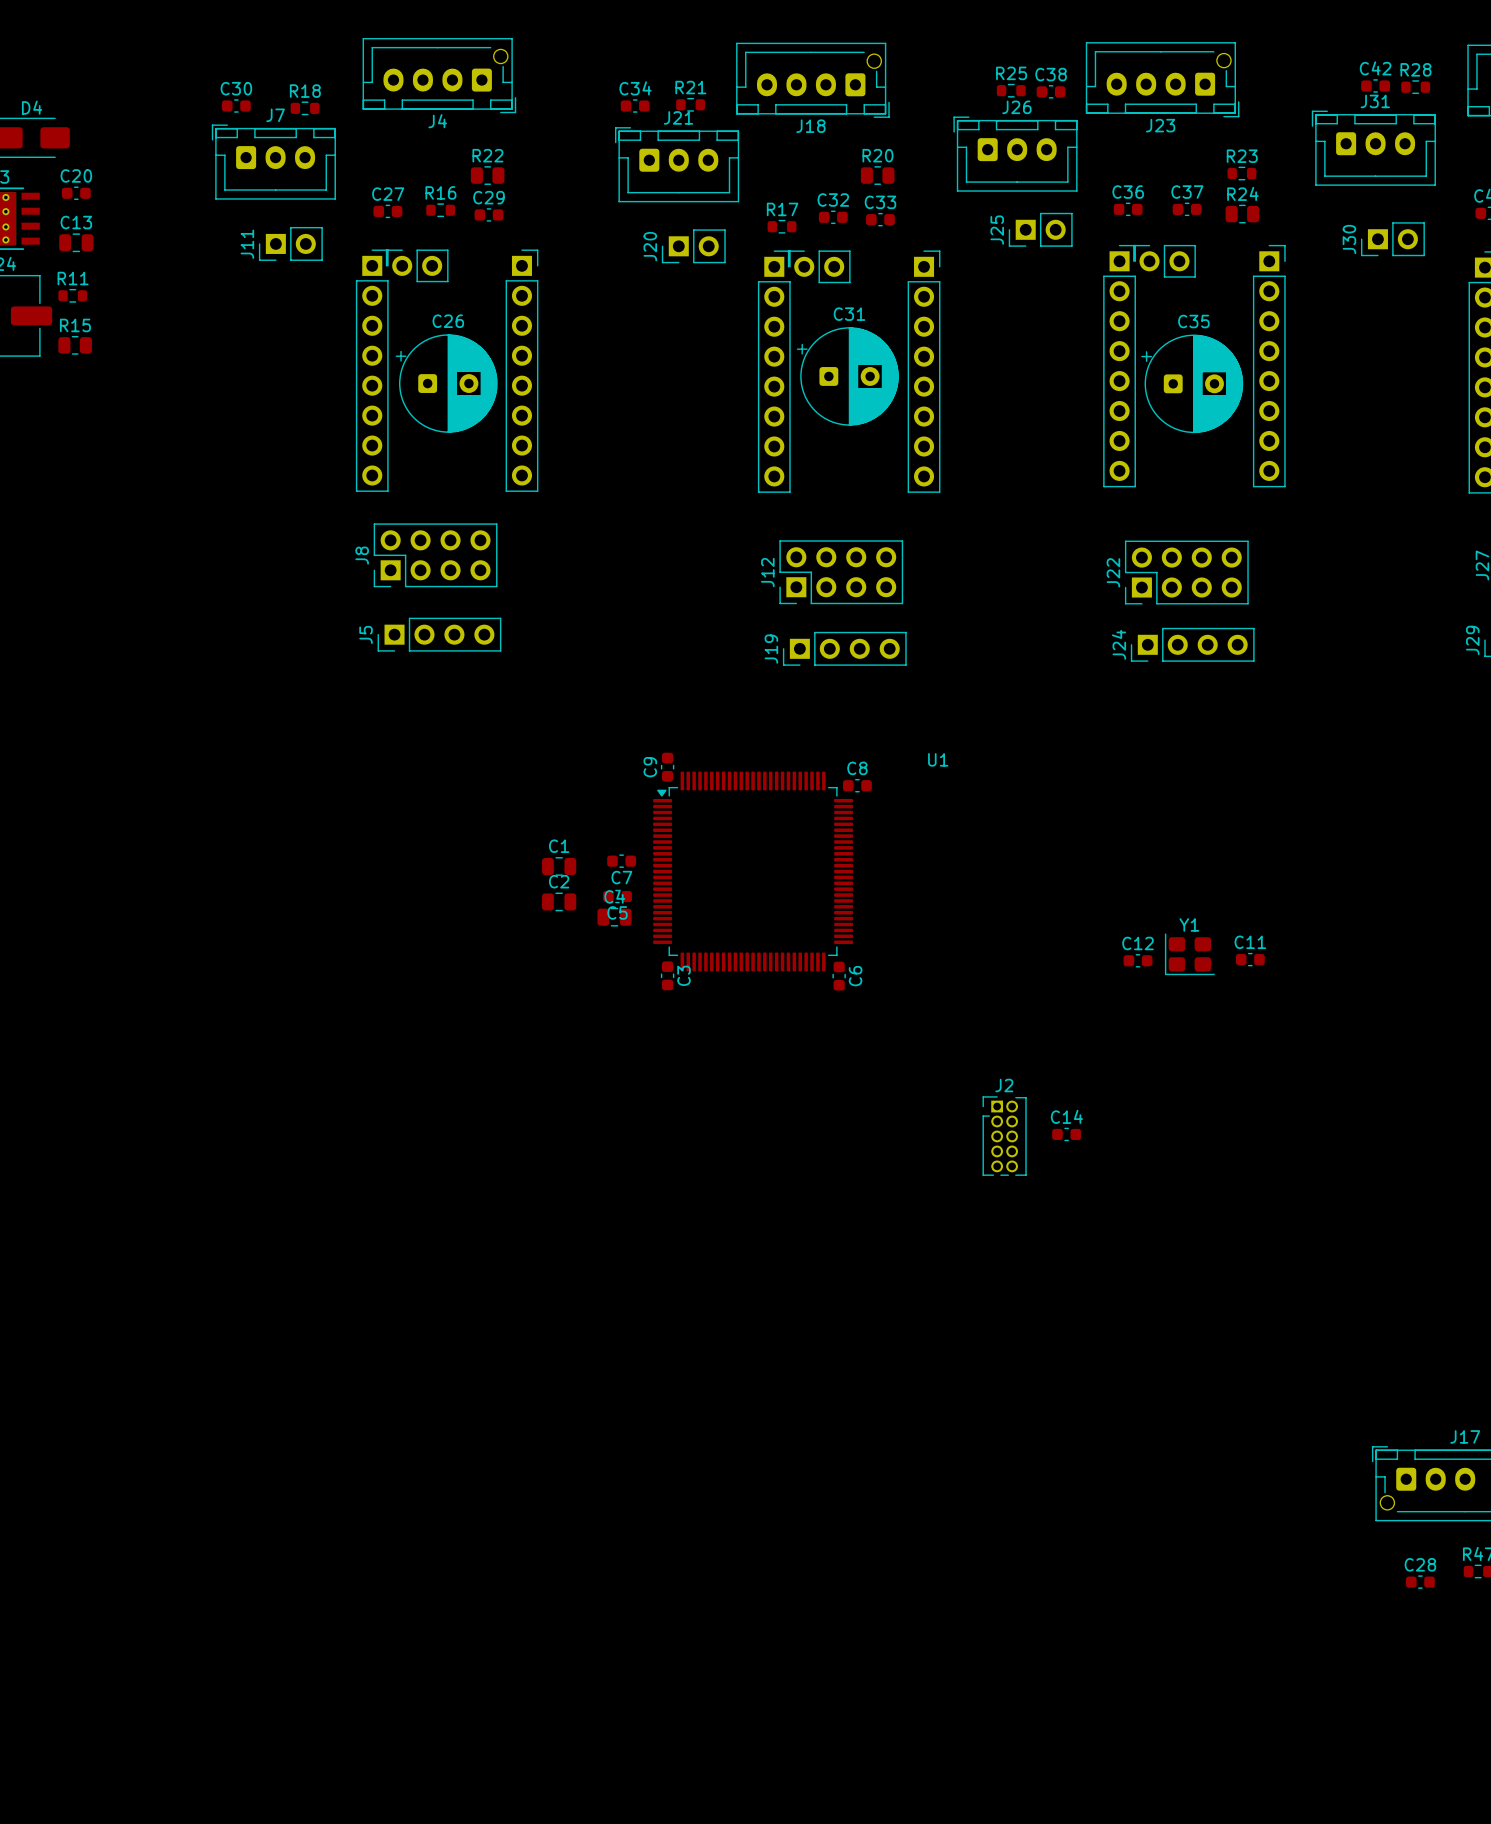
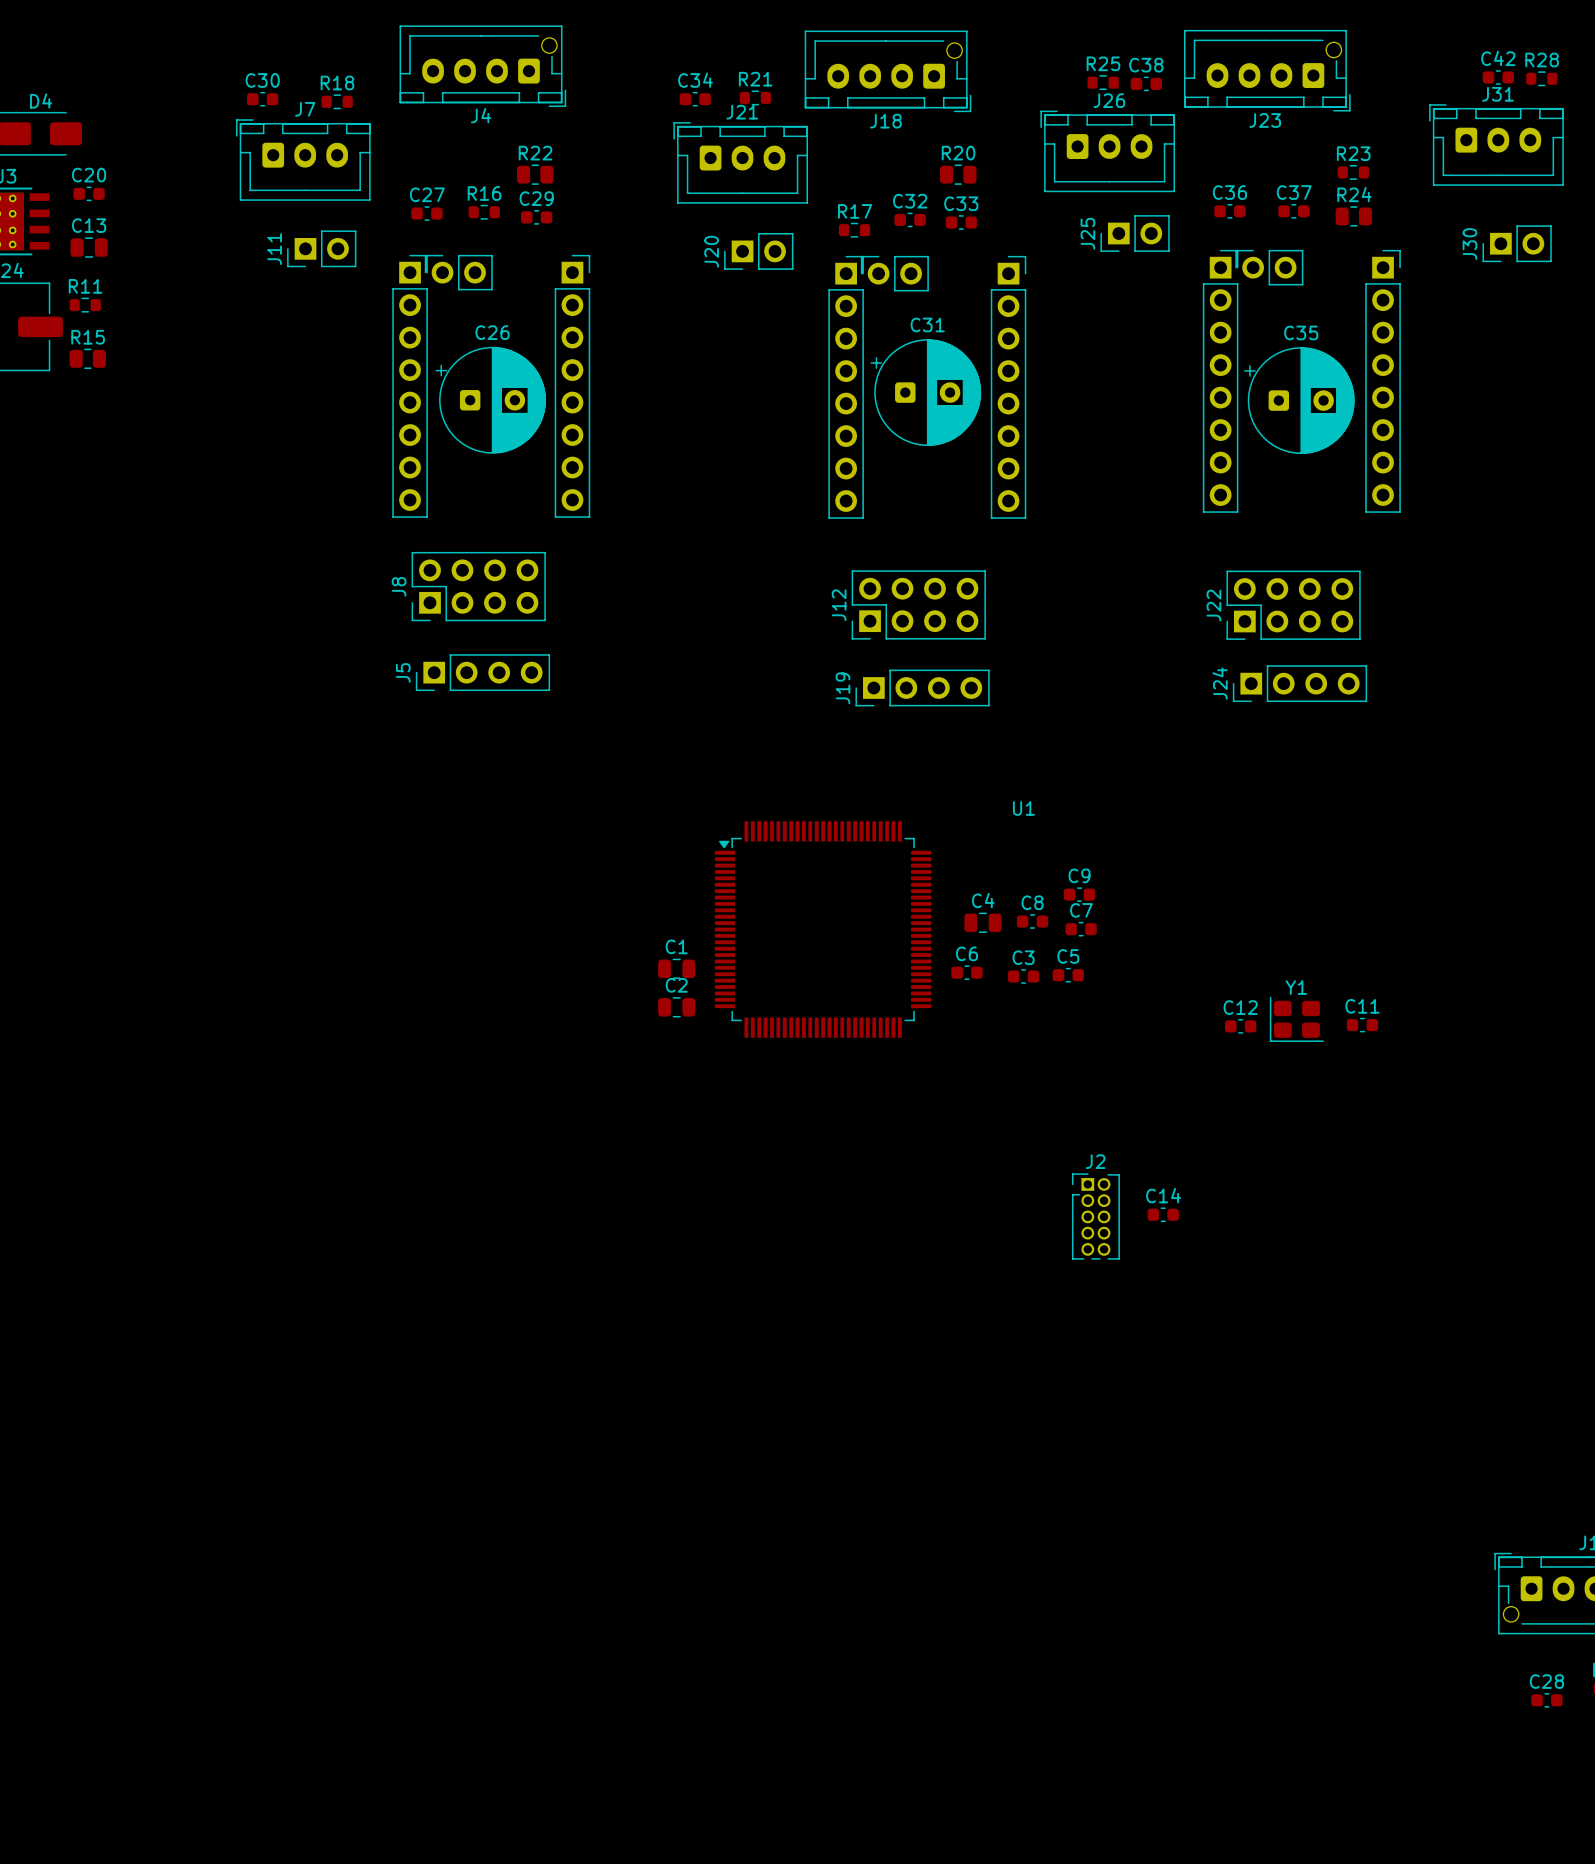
C9 rotation: 0° (667, 767) -> 90° clockwise (1079, 894)
C9 position: (667, 767) -> (1079, 894)
C8 position: (857, 785) -> (1032, 921)
C7 position: (621, 861) -> (1081, 929)
C1 position: (559, 866) -> (676, 968)
C7 name position: C7 (621, 877) -> C7 (1081, 910)
C5 position: (617, 896) -> (1068, 975)
C2 position: (559, 901) -> (676, 1007)
C5 name position: C5 (617, 912) -> C5 (1068, 956)
C4 position: (614, 917) -> (982, 922)
C3 rotation: 0° (667, 975) -> 90° clockwise (1023, 976)
C3 position: (667, 975) -> (1023, 976)
C3 name position: C3 (684, 975) -> C3 (1023, 957)
C6 rotation: 0° (839, 976) -> 90° clockwise (966, 972)
C6 position: (839, 976) -> (966, 972)
C6 name position: C6 (855, 976) -> C6 (966, 953)

